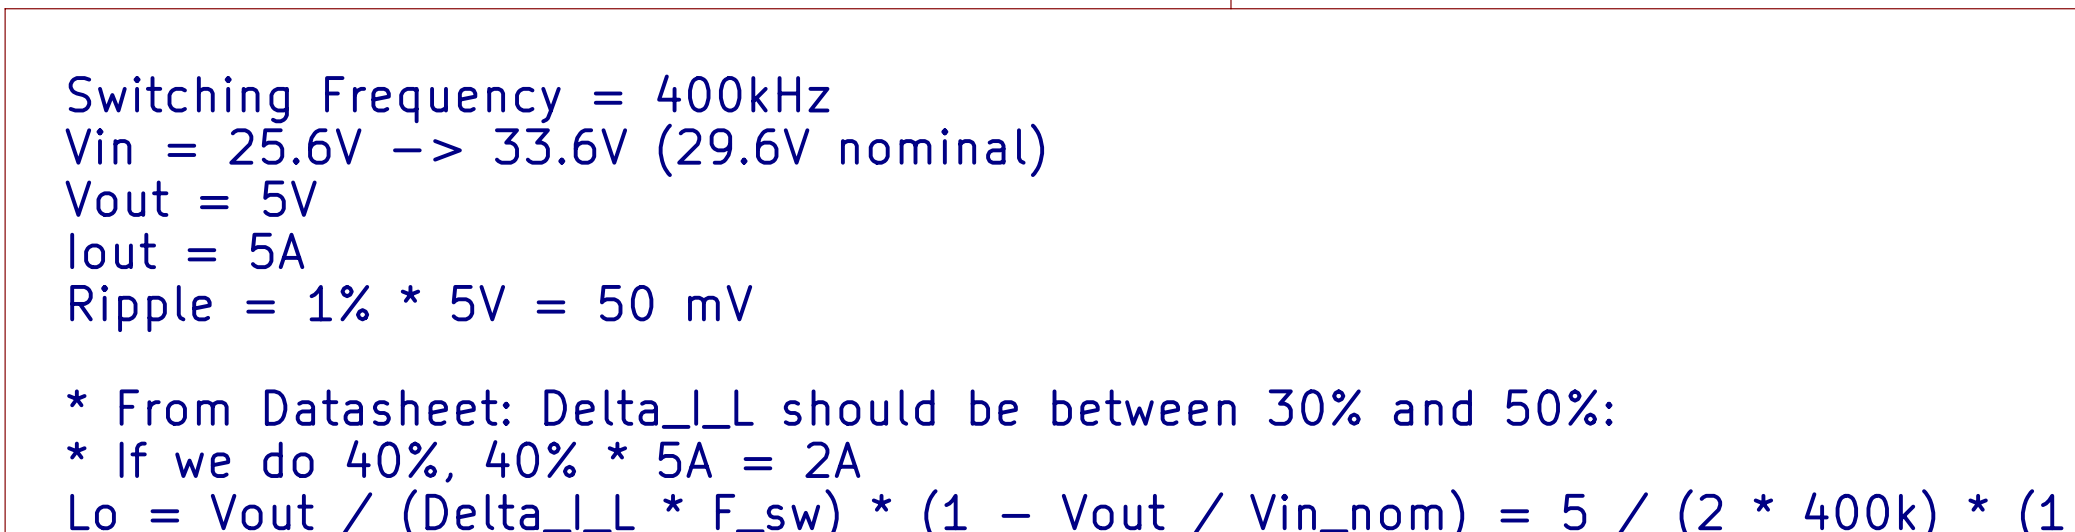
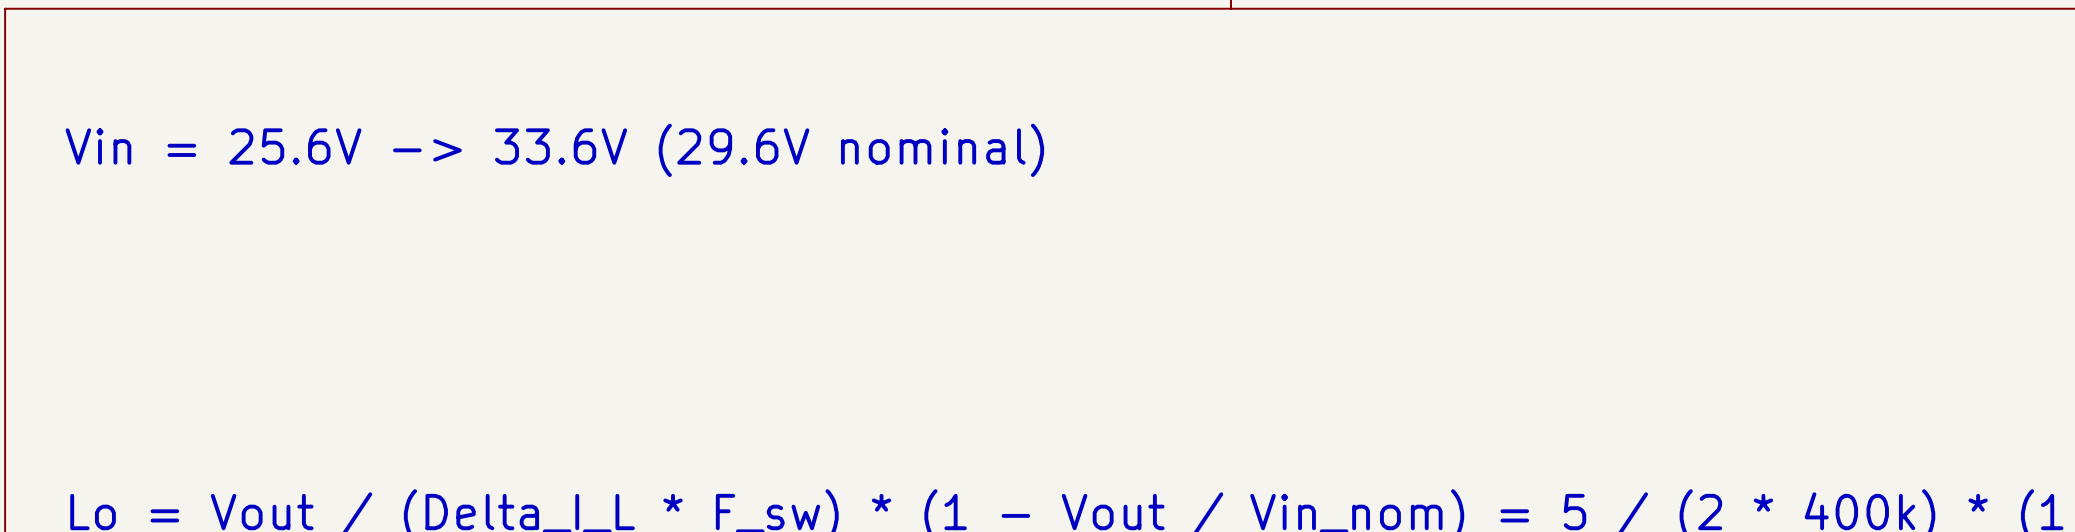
text: Switching Frequency = 400kHz (449, 98) -> none
text: Vout = 5V (191, 198) -> none
text: Iout = 5A (187, 250) -> none
text: Ripple = 1% * 5V = 50 mV (411, 308) -> none
text: * From Datasheet: Delta_I_L should be between 30% and 50%: (839, 409) -> none
text: * If we do 40%, 40% * 5A = 2A (463, 461) -> none

